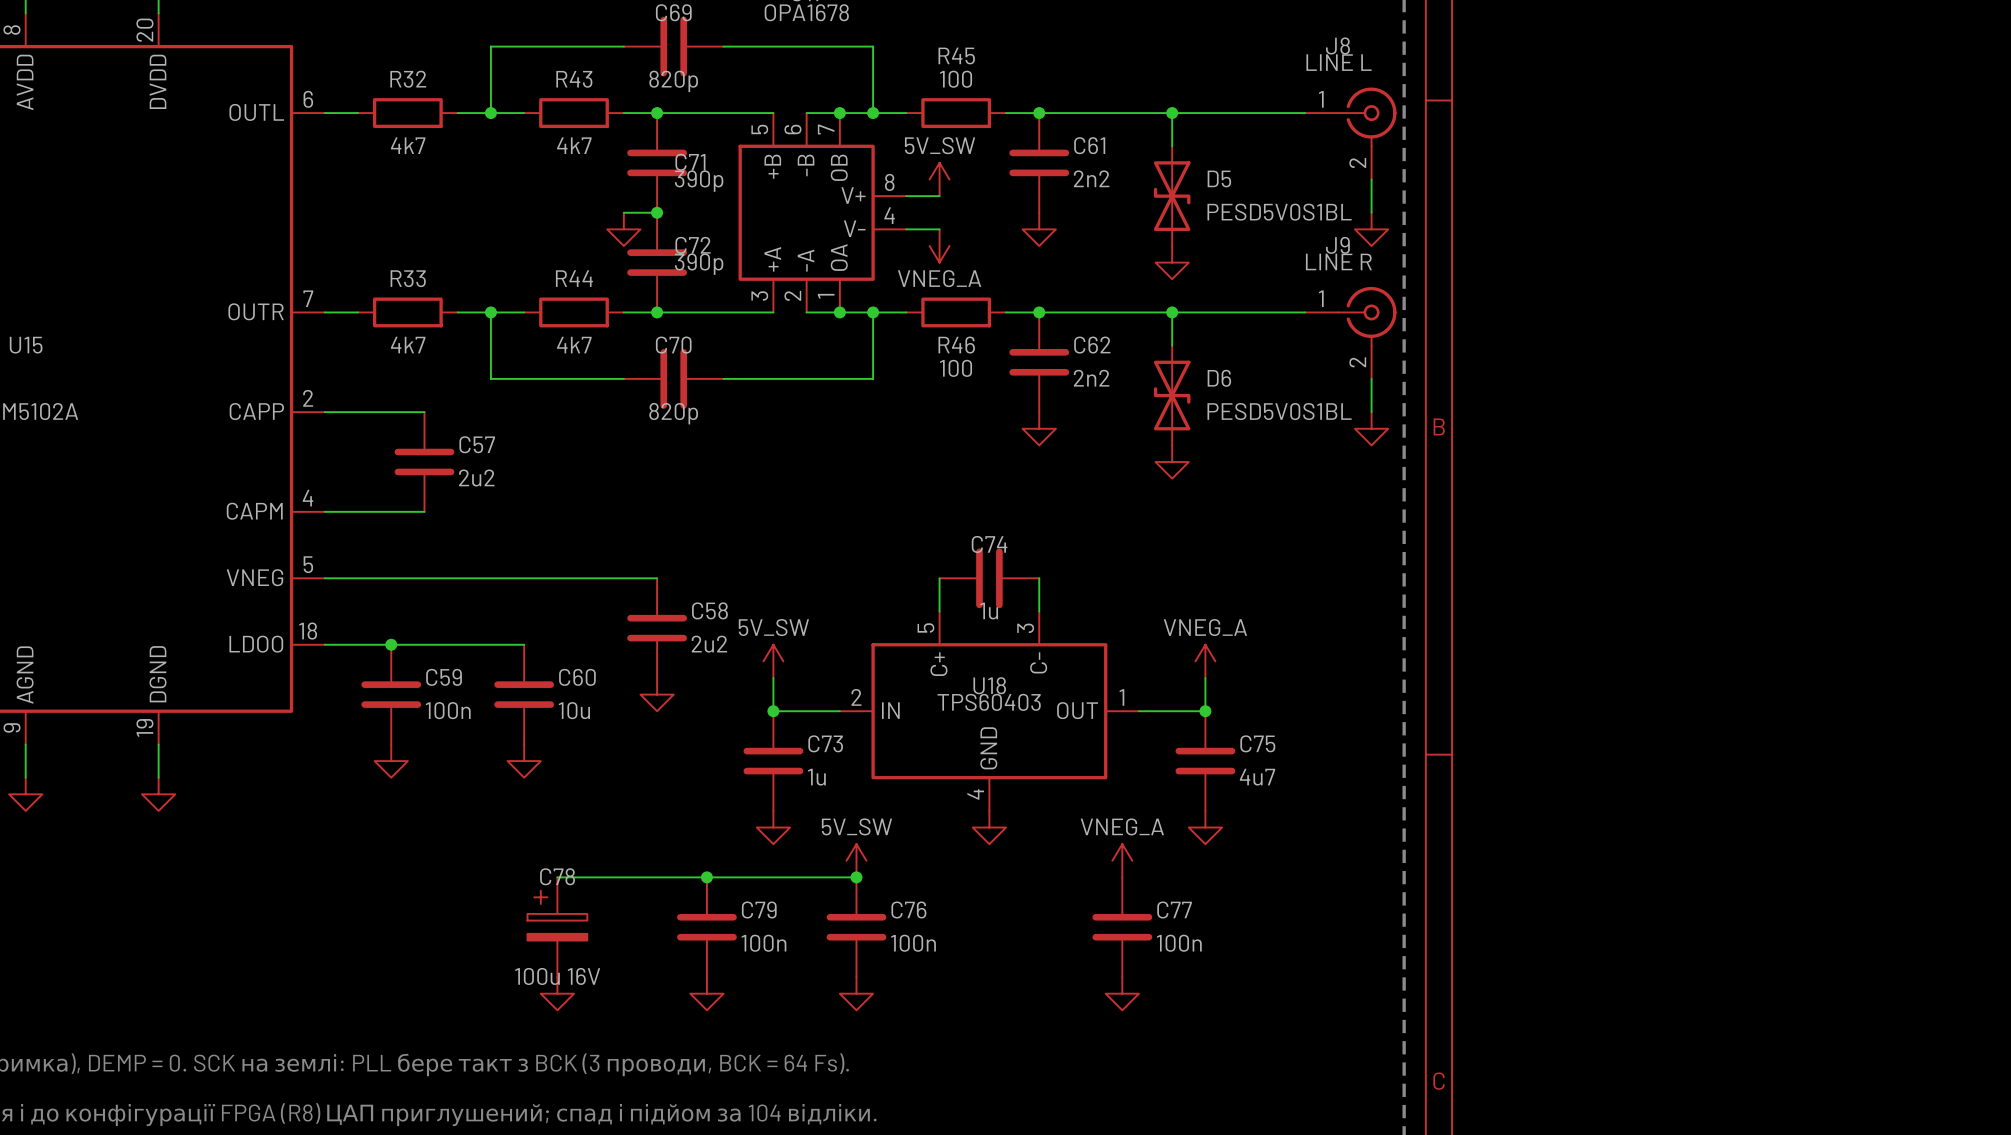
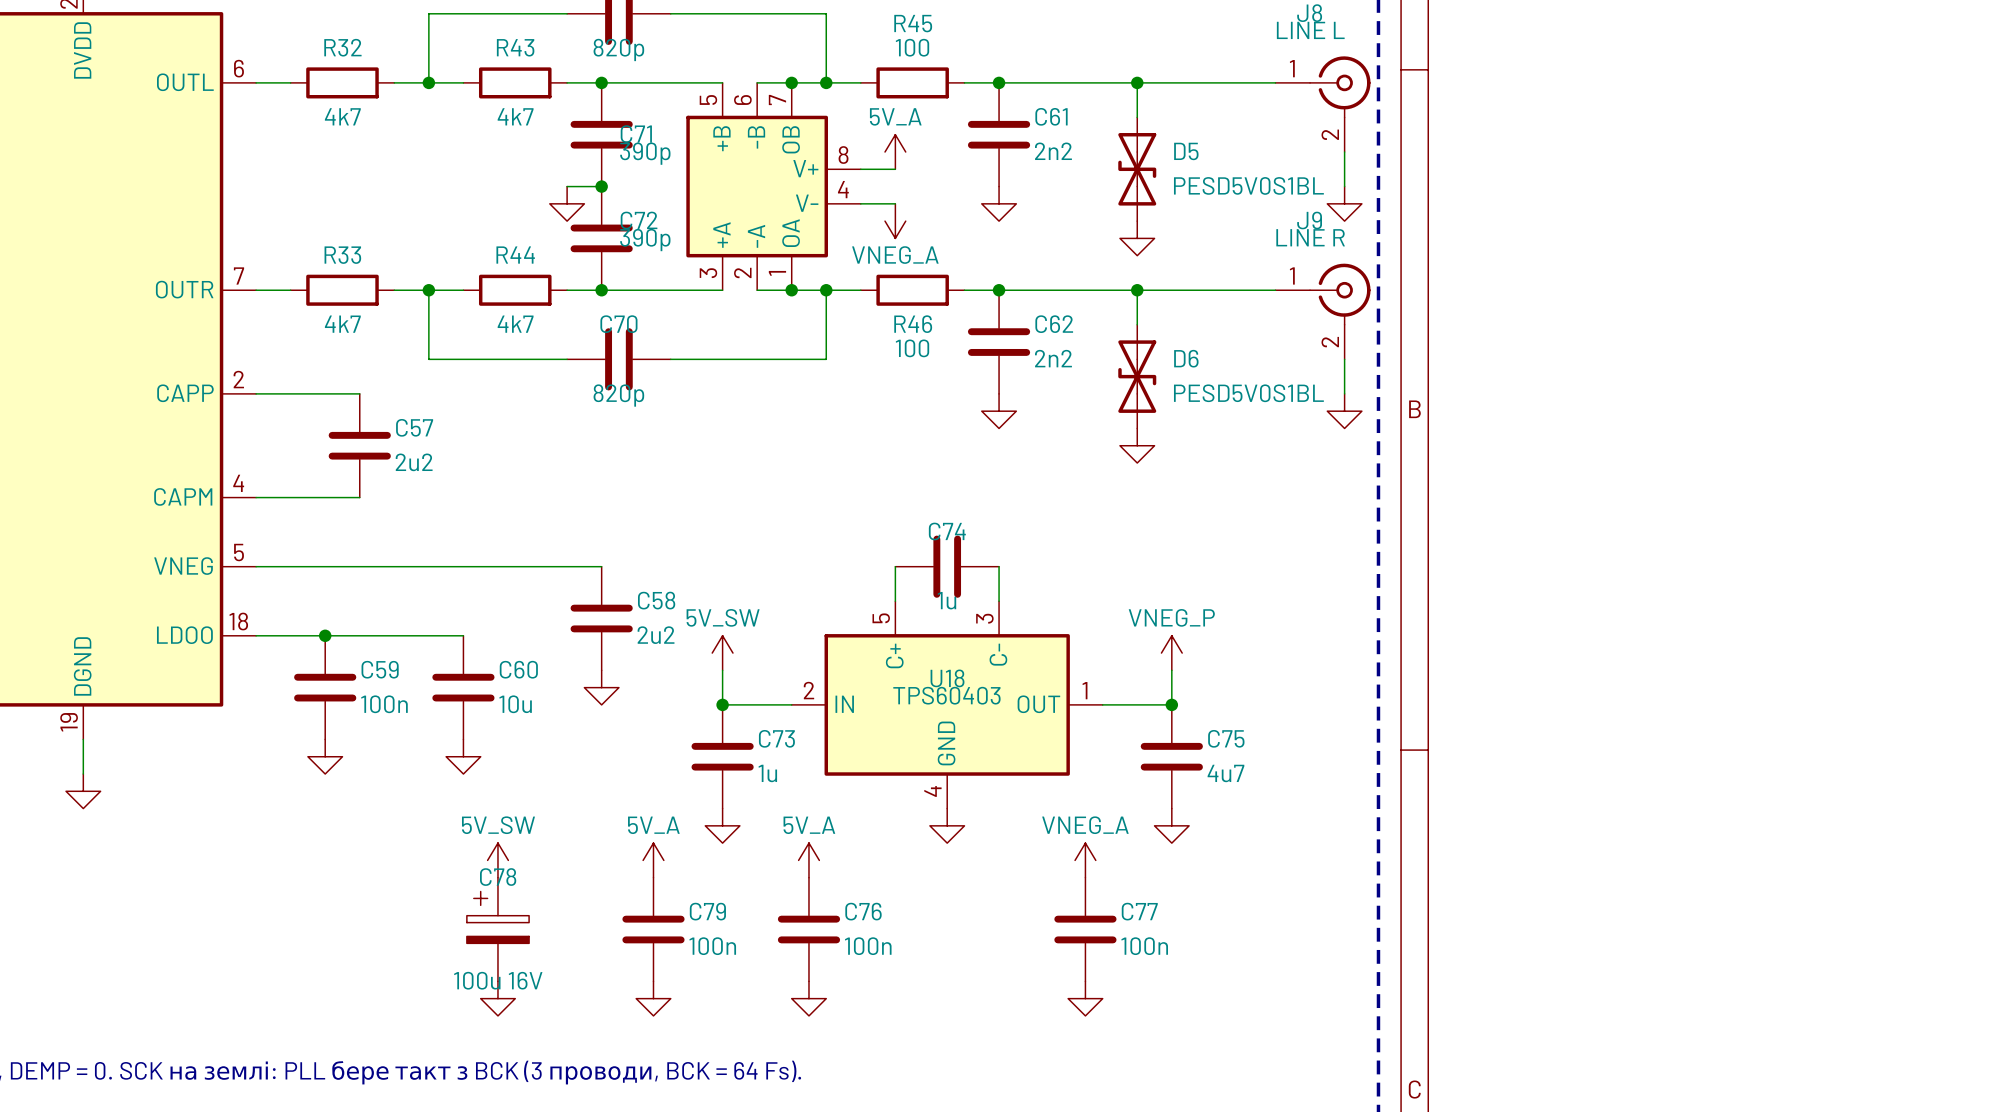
power symbol: 5V_SW (939, 179) -> 5V_A (895, 152)
power symbol: VNEG_A (1205, 661) -> VNEG_P (1171, 653)
power symbol: none -> 5V_SW (497, 860)
power symbol: none -> 5V_A (653, 860)
power symbol: 5V_SW (856, 860) -> 5V_A (808, 860)
wire: (557, 877) (856, 877) -> none
junction: (706, 877) -> none
junction: (856, 877) -> none

